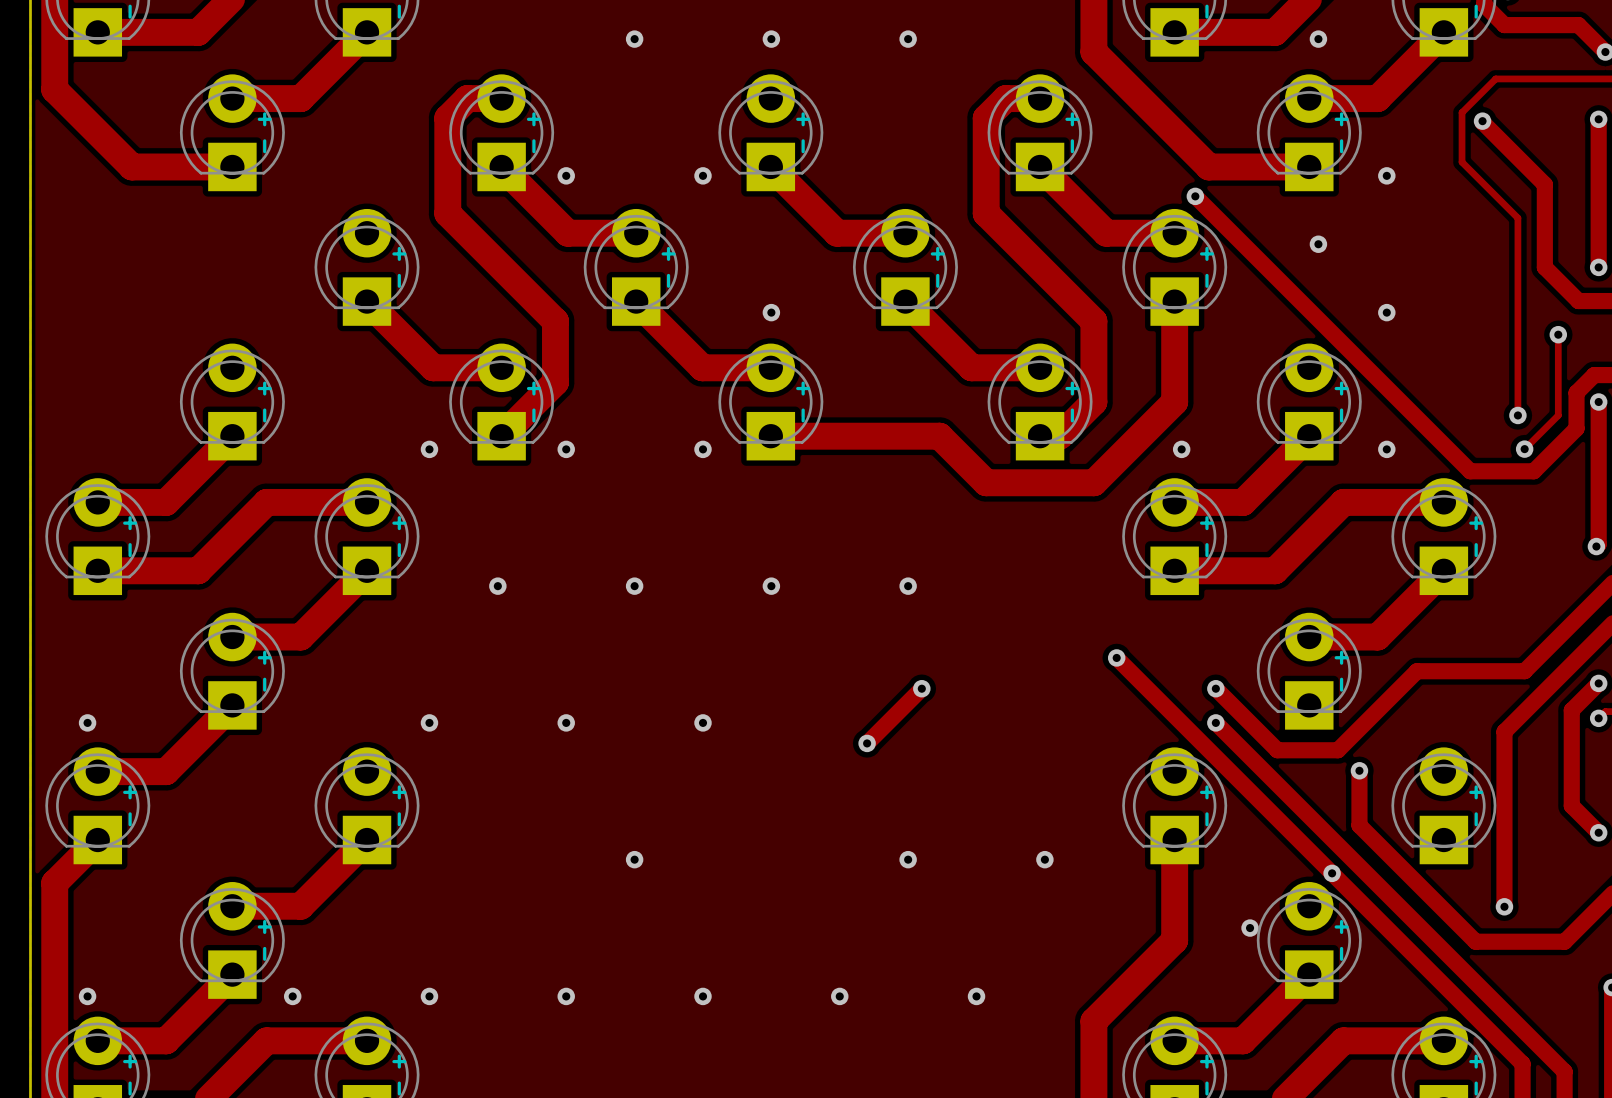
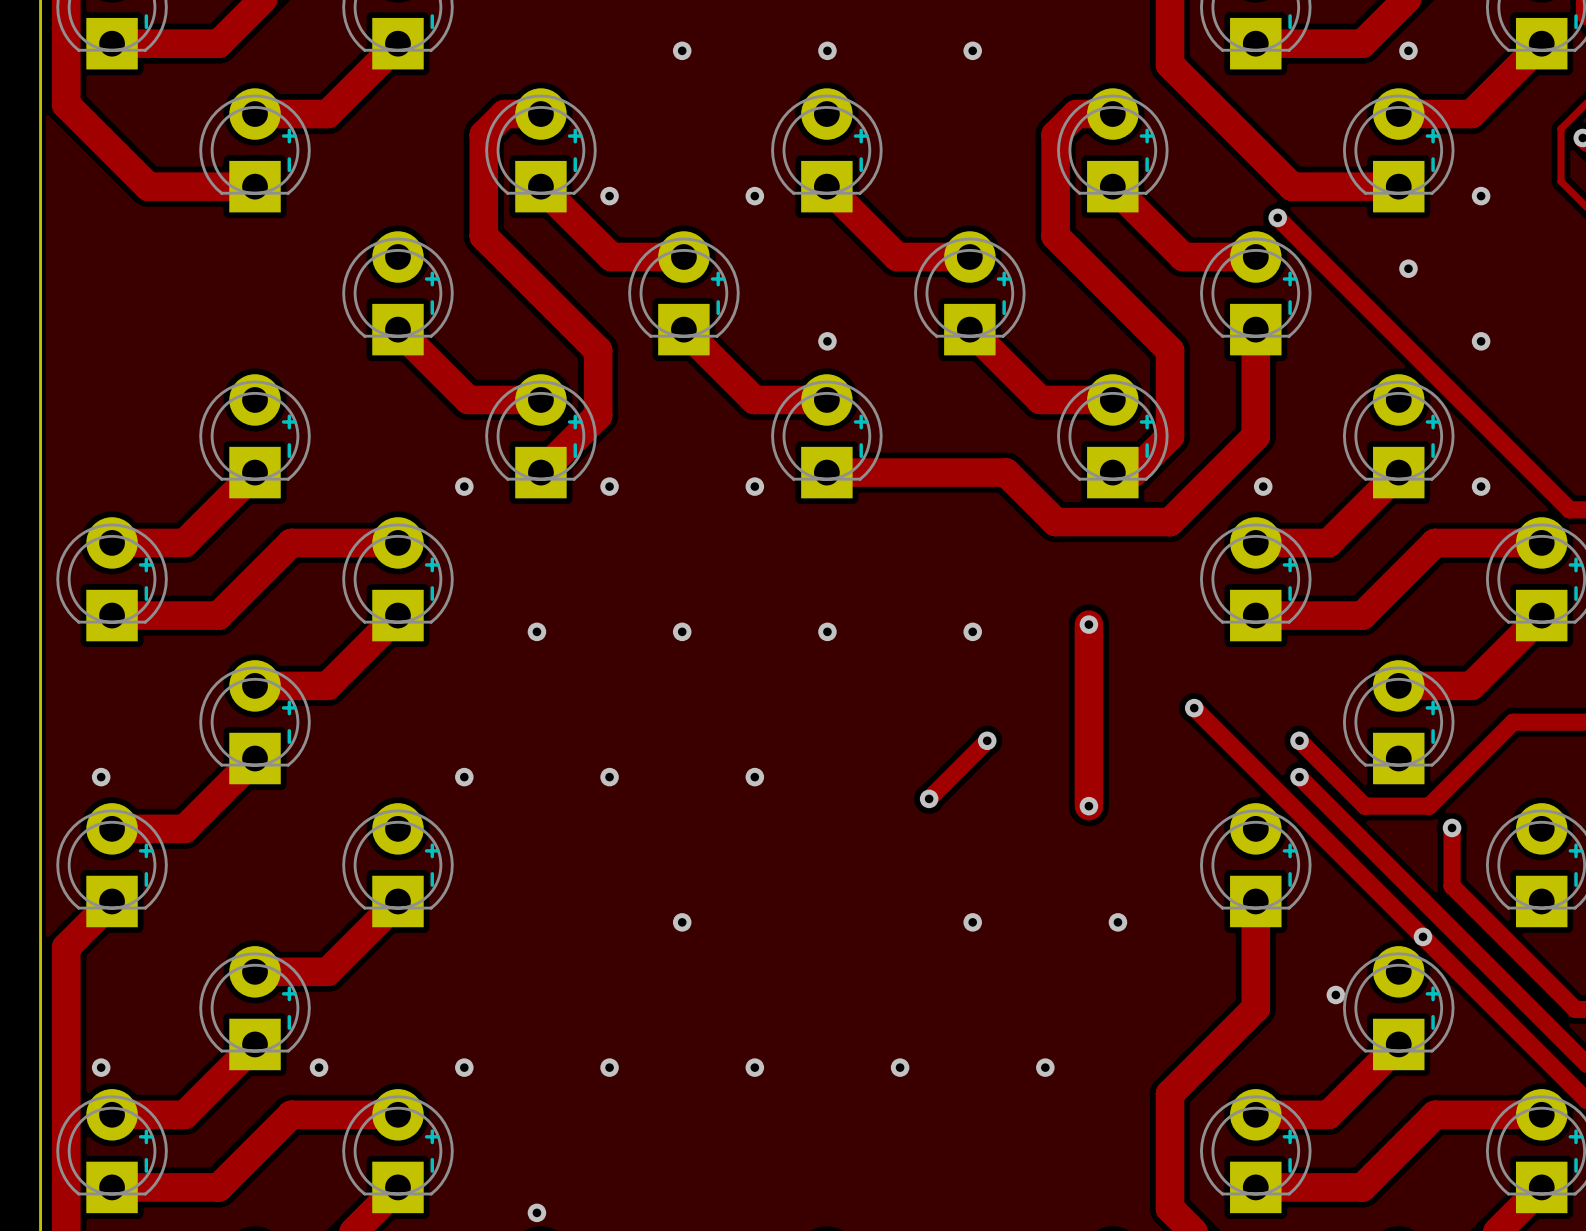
track: none -> (1088, 624) (1088, 806)
via: none -> (1088, 624)
via: none -> (1088, 806)

